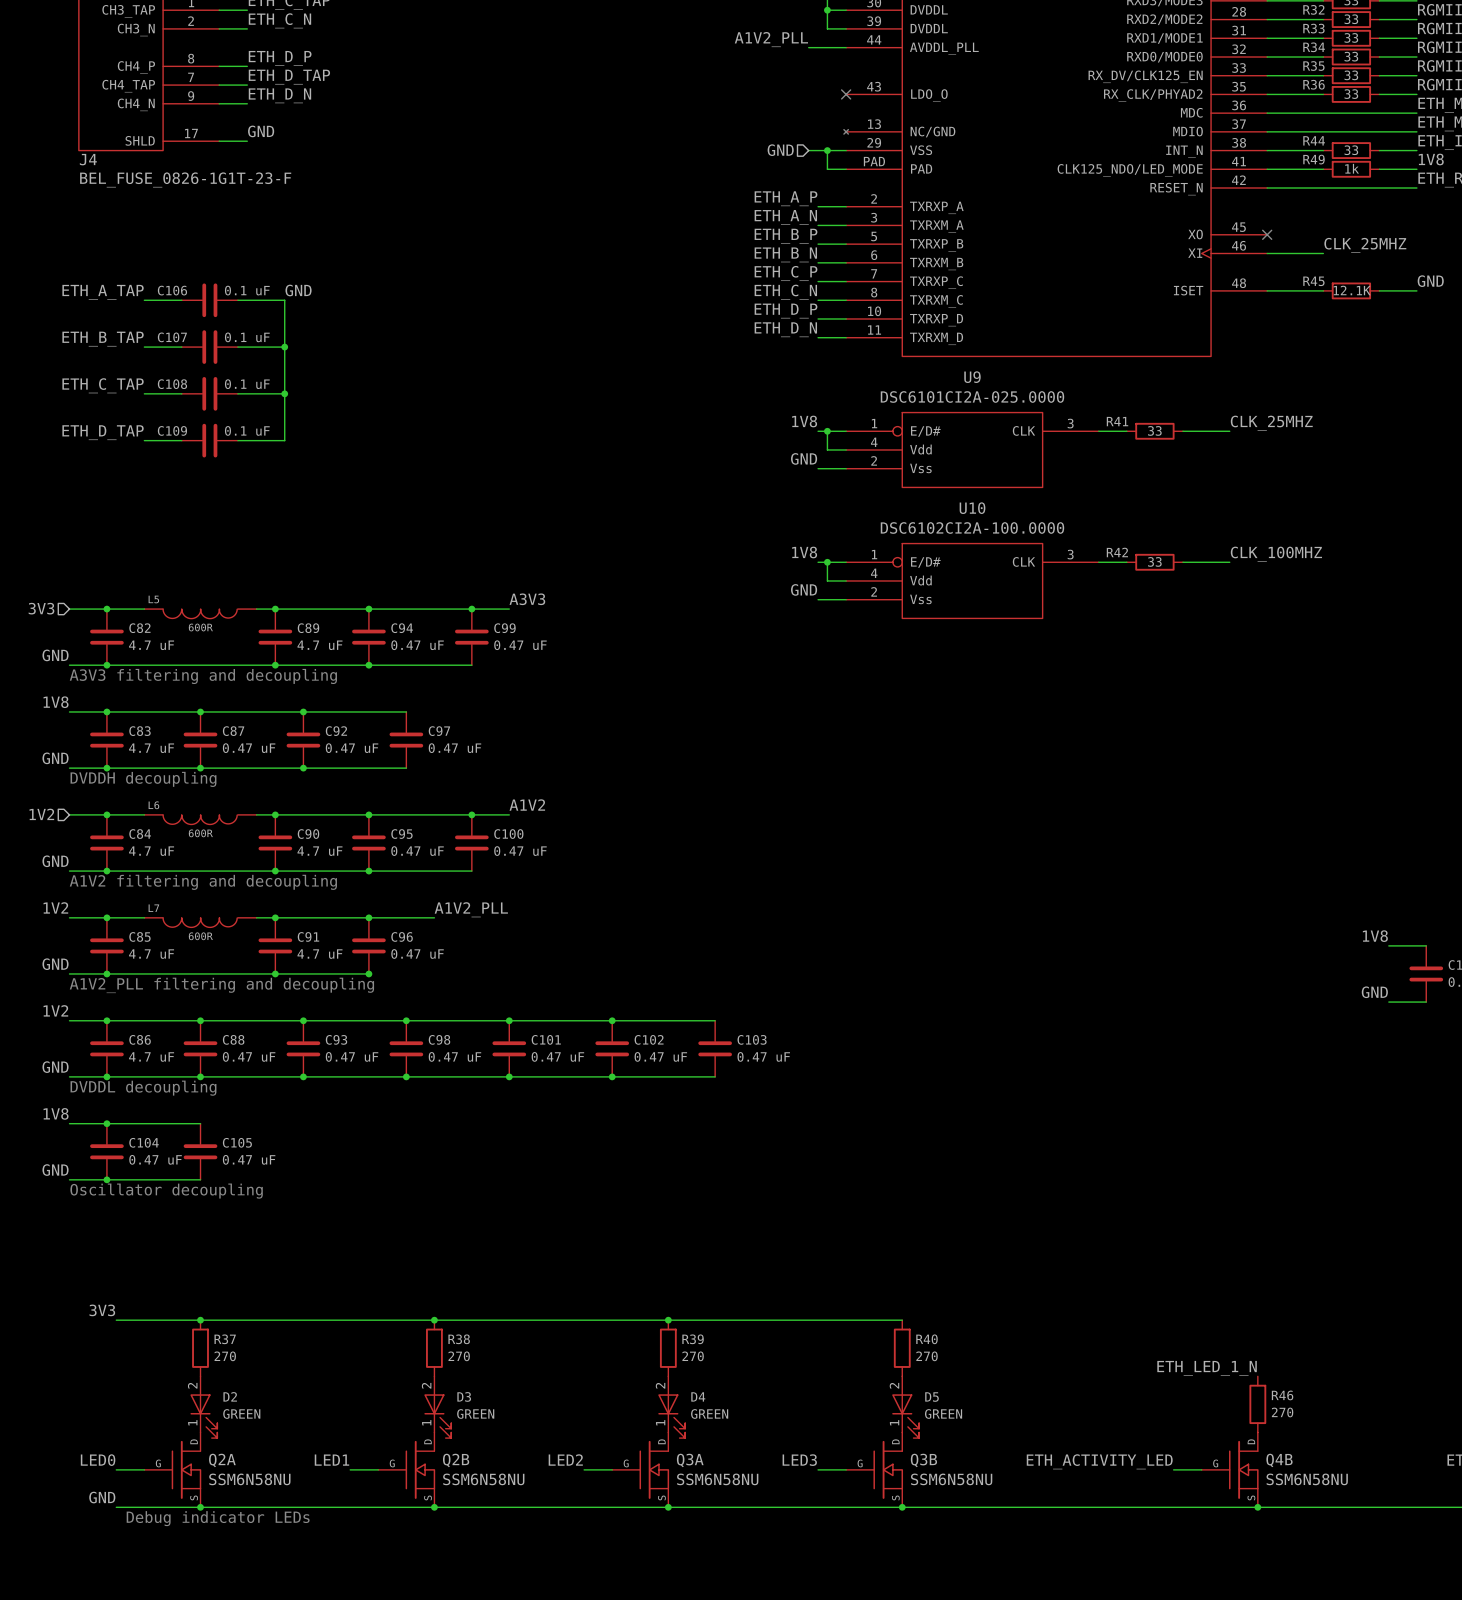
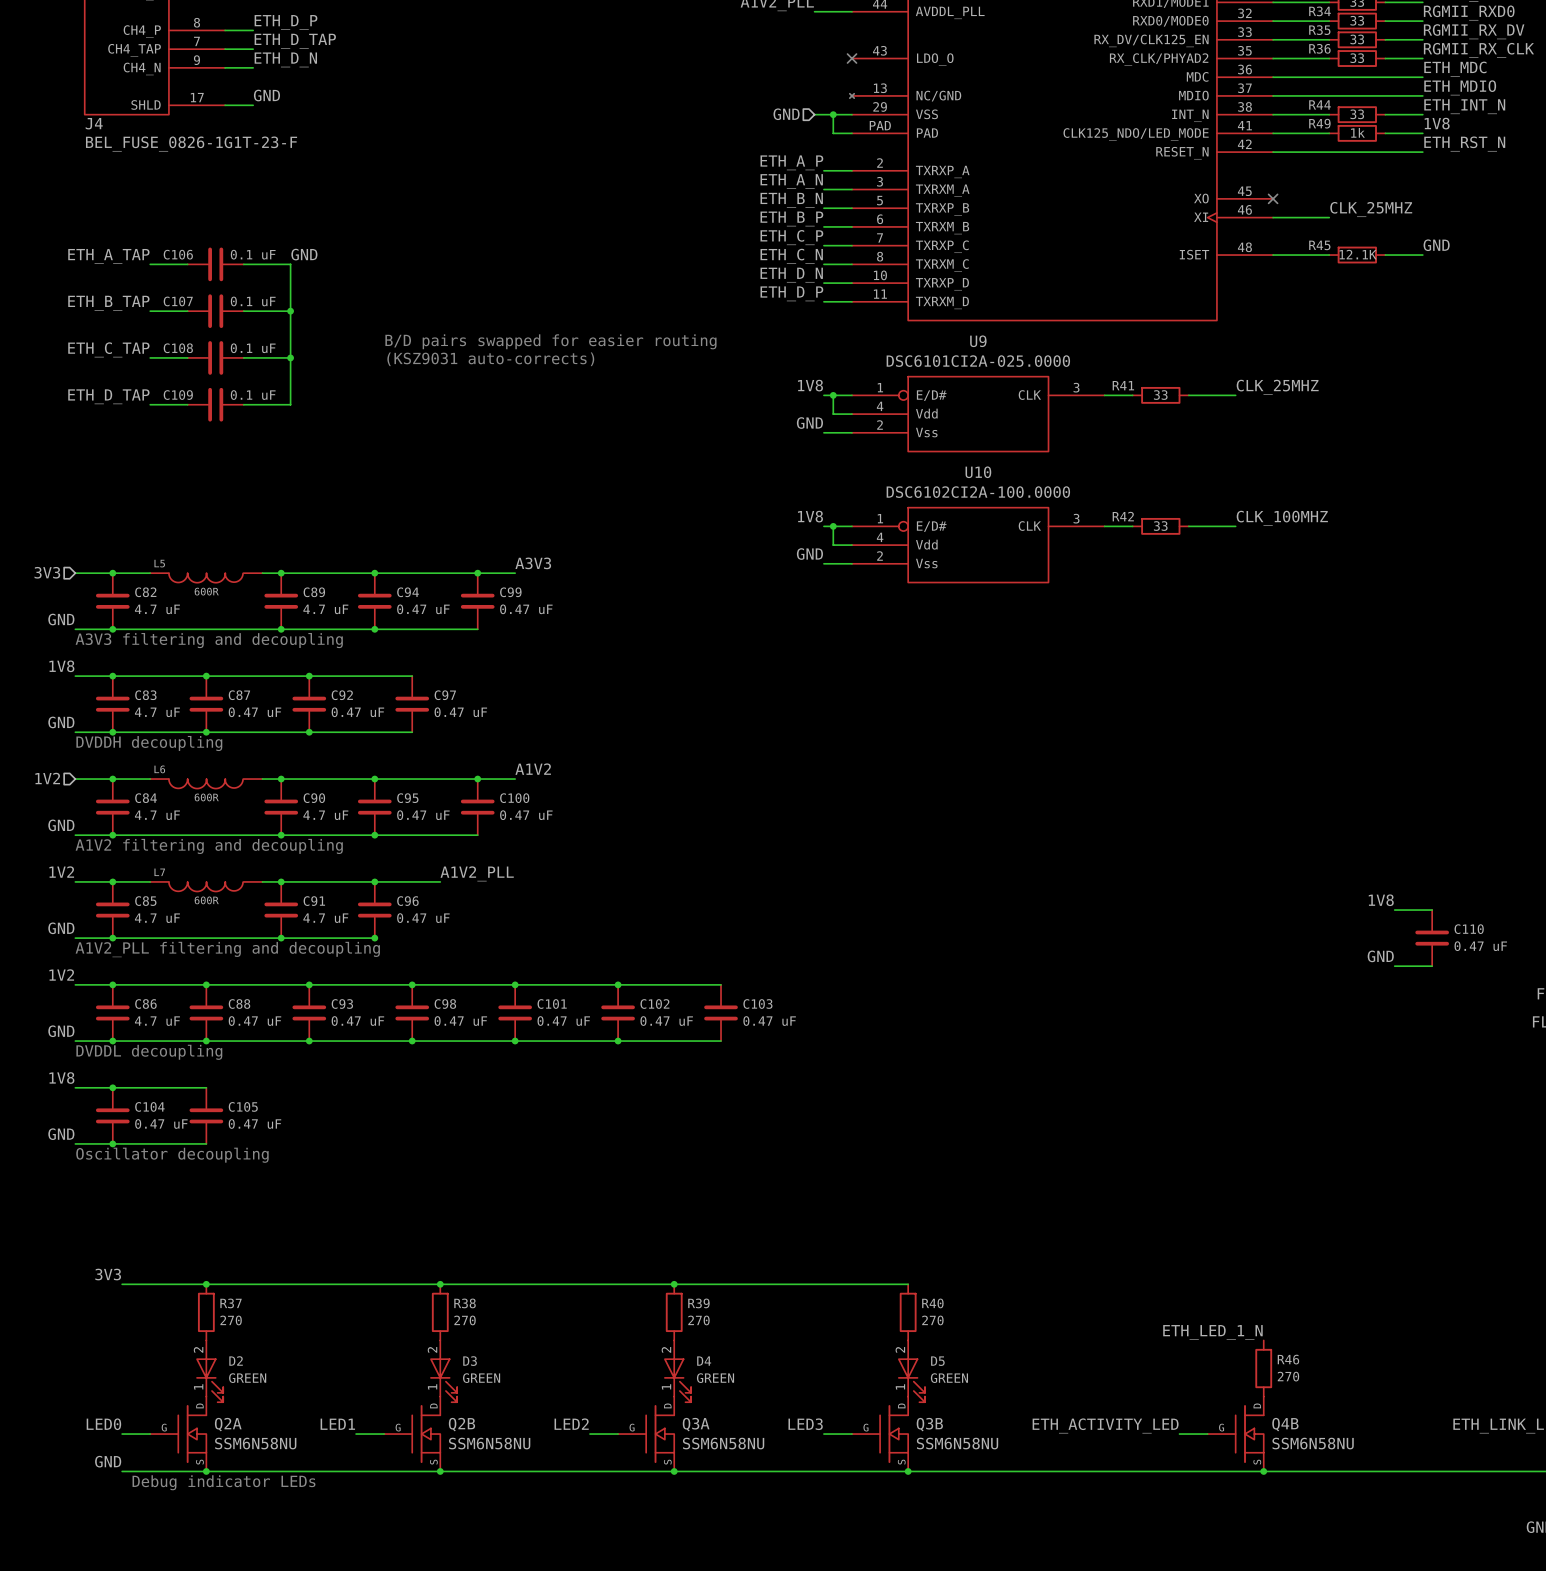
label: ETH_B_P (786, 236) -> ETH_B_N (791, 200)
label: ETH_B_N (785, 254) -> ETH_B_P (791, 218)
label: ETH_D_P (786, 311) -> ETH_D_N (791, 275)
label: ETH_D_N (785, 329) -> ETH_D_P (791, 293)
text: none -> B/D pairs swapped for easier routing (550, 341)
text: none -> (KSZ9031 auto-corrects) (490, 359)

